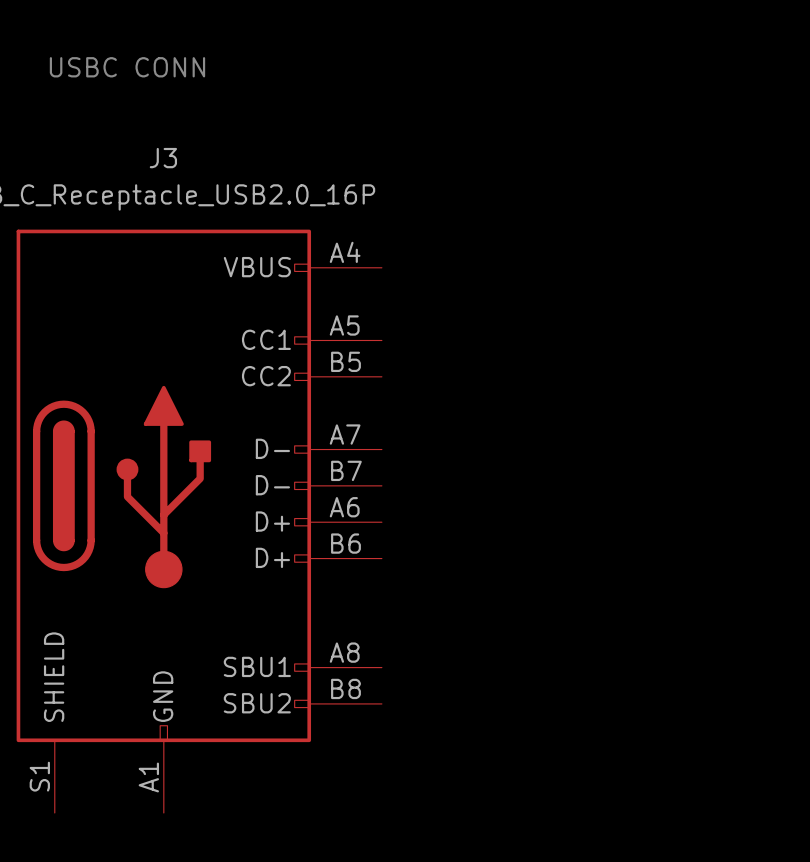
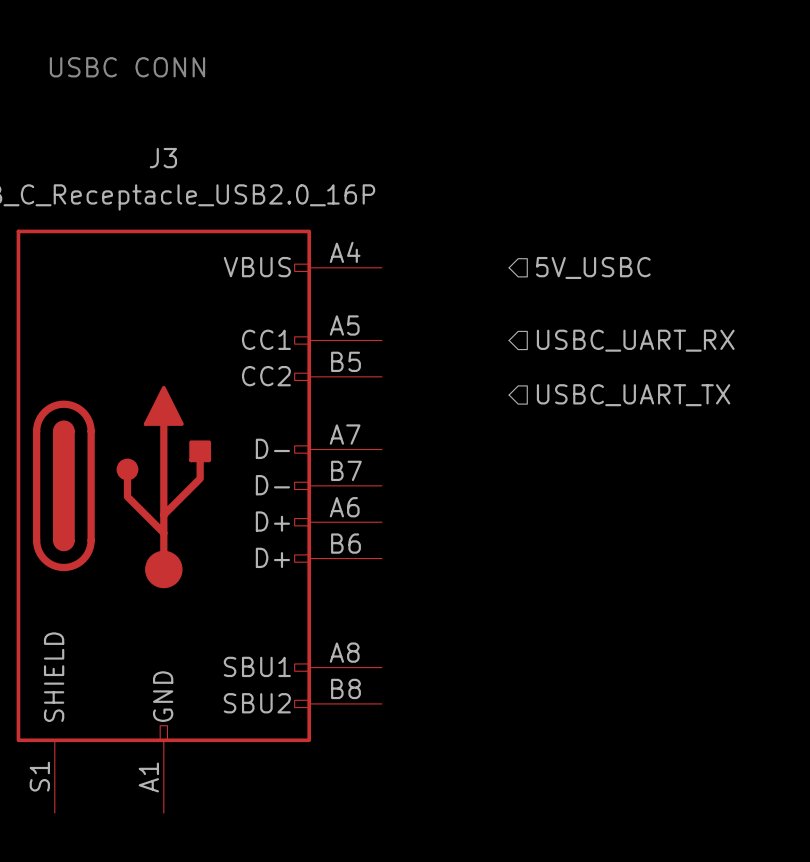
hierarchical label: none -> 5V_USBC (593, 267)
hierarchical label: none -> USBC_UART_RX (635, 340)
hierarchical label: none -> USBC_UART_TX (633, 395)

